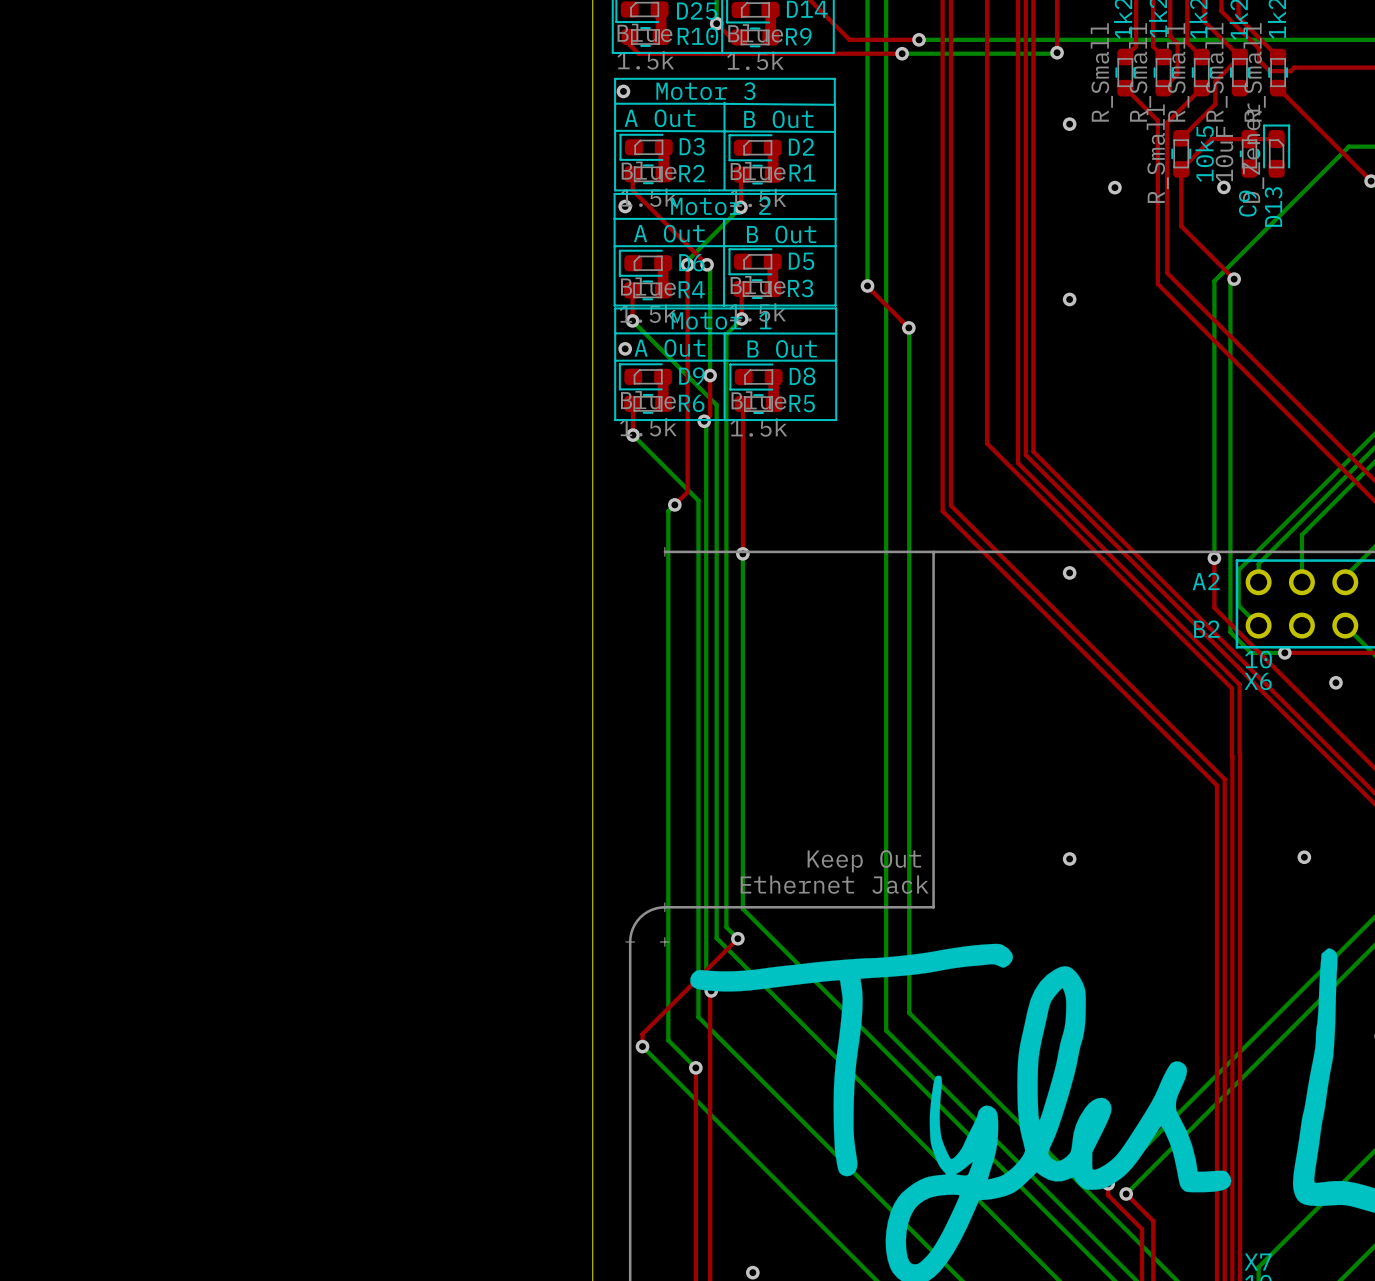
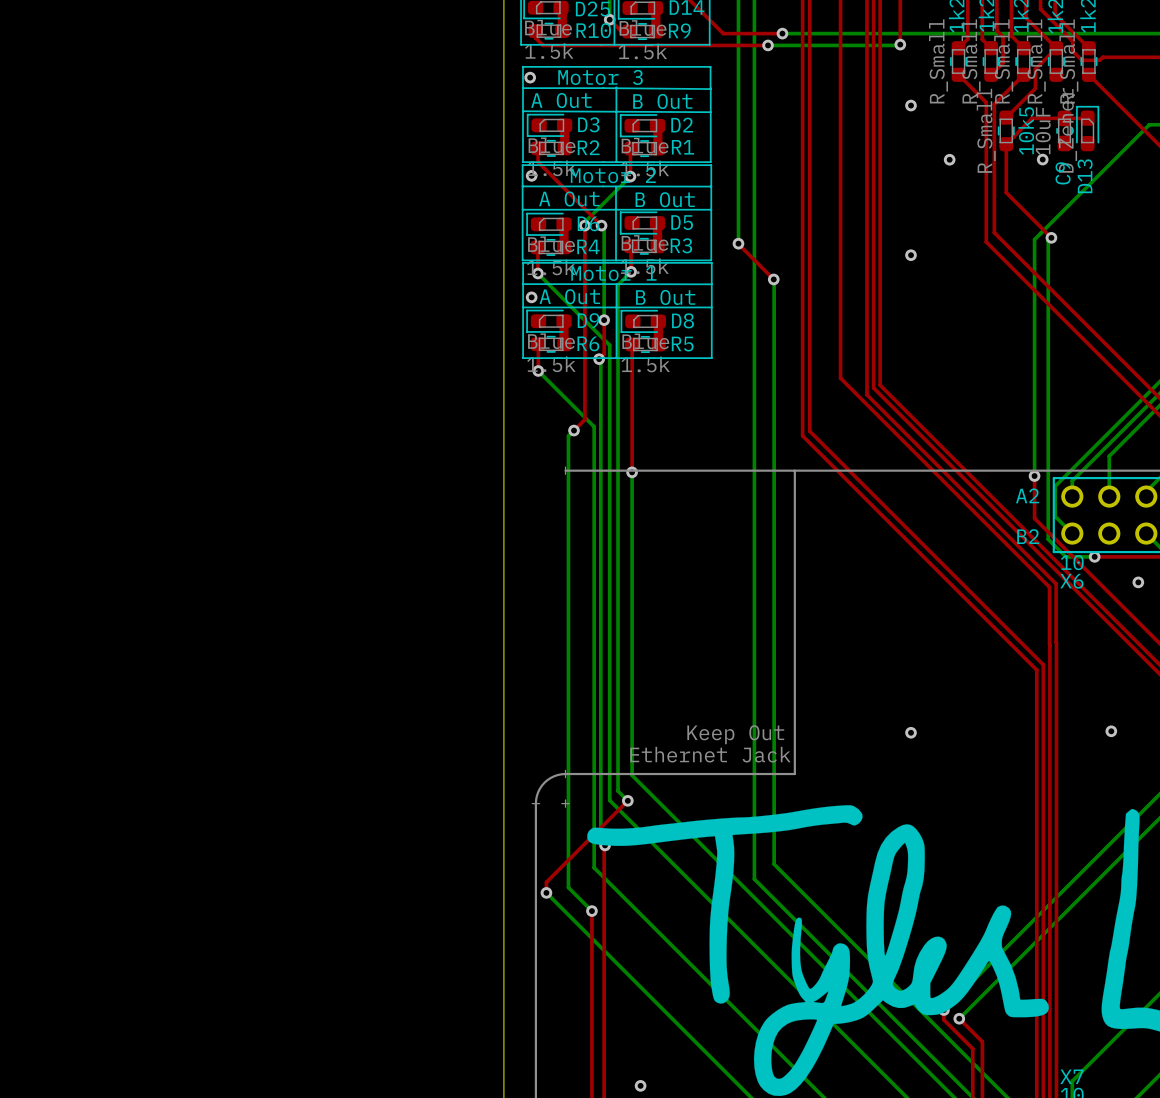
via: (1069, 572) -> none

